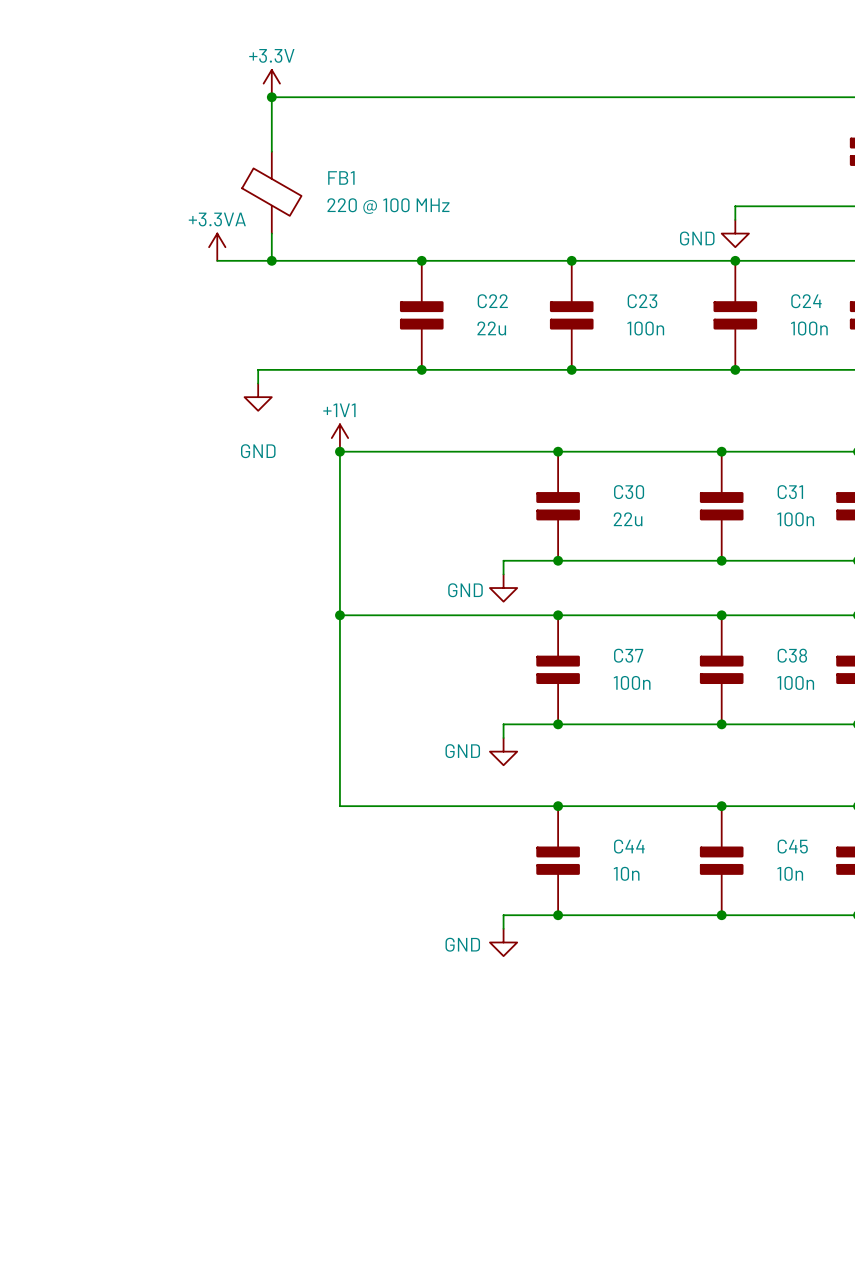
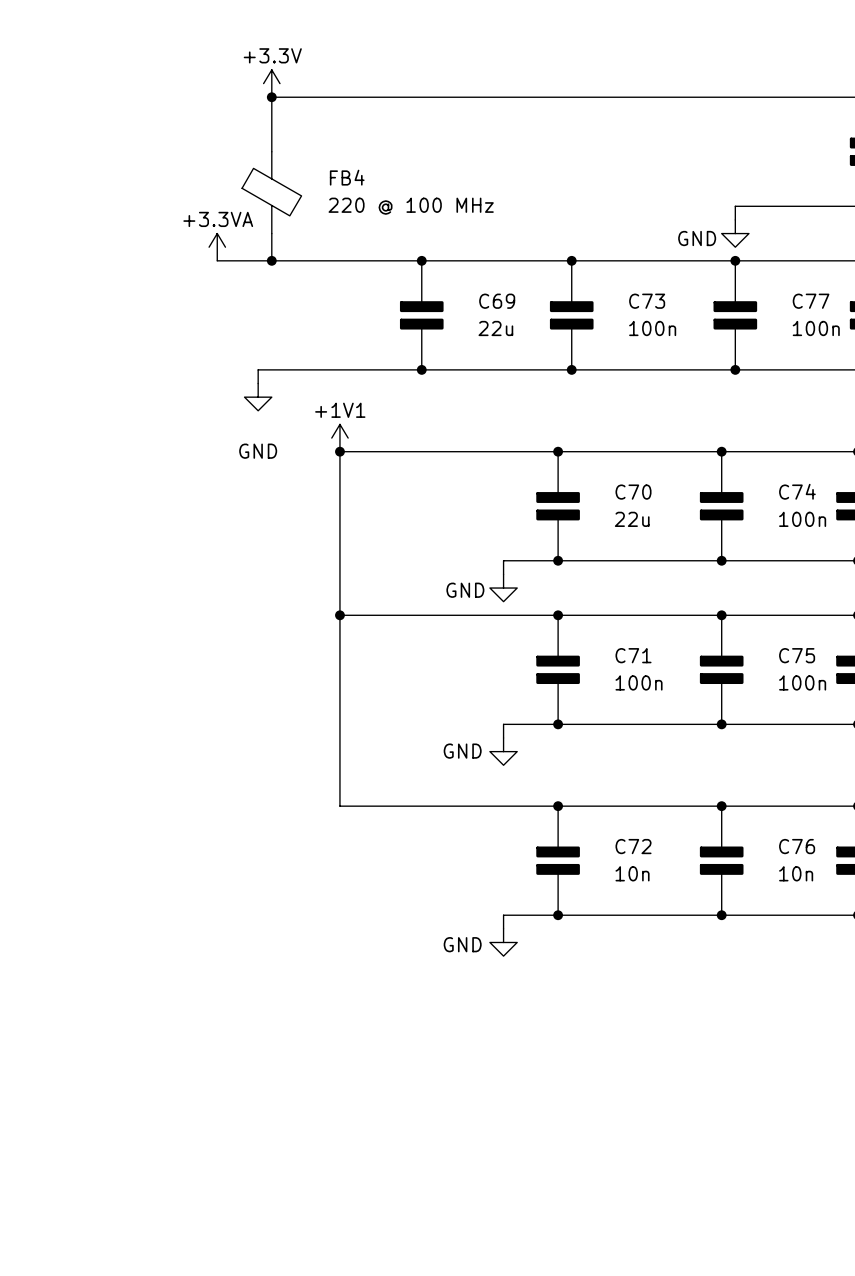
FB1 name: FB1 (341, 177) -> FB4 (347, 177)
C22 name: C22 (492, 301) -> C69 (497, 301)
C23 name: C23 (642, 301) -> C73 (647, 301)
C24 name: C24 (806, 301) -> C77 (811, 301)
C30 name: C30 (629, 492) -> C70 (633, 492)
C31 name: C31 (790, 492) -> C74 (797, 491)
C37 name: C37 (628, 655) -> C71 (633, 655)
C38 name: C38 (792, 655) -> C75 (797, 655)
C44 name: C44 (629, 846) -> C72 (633, 846)
C45 name: C45 (792, 846) -> C76 (797, 846)

